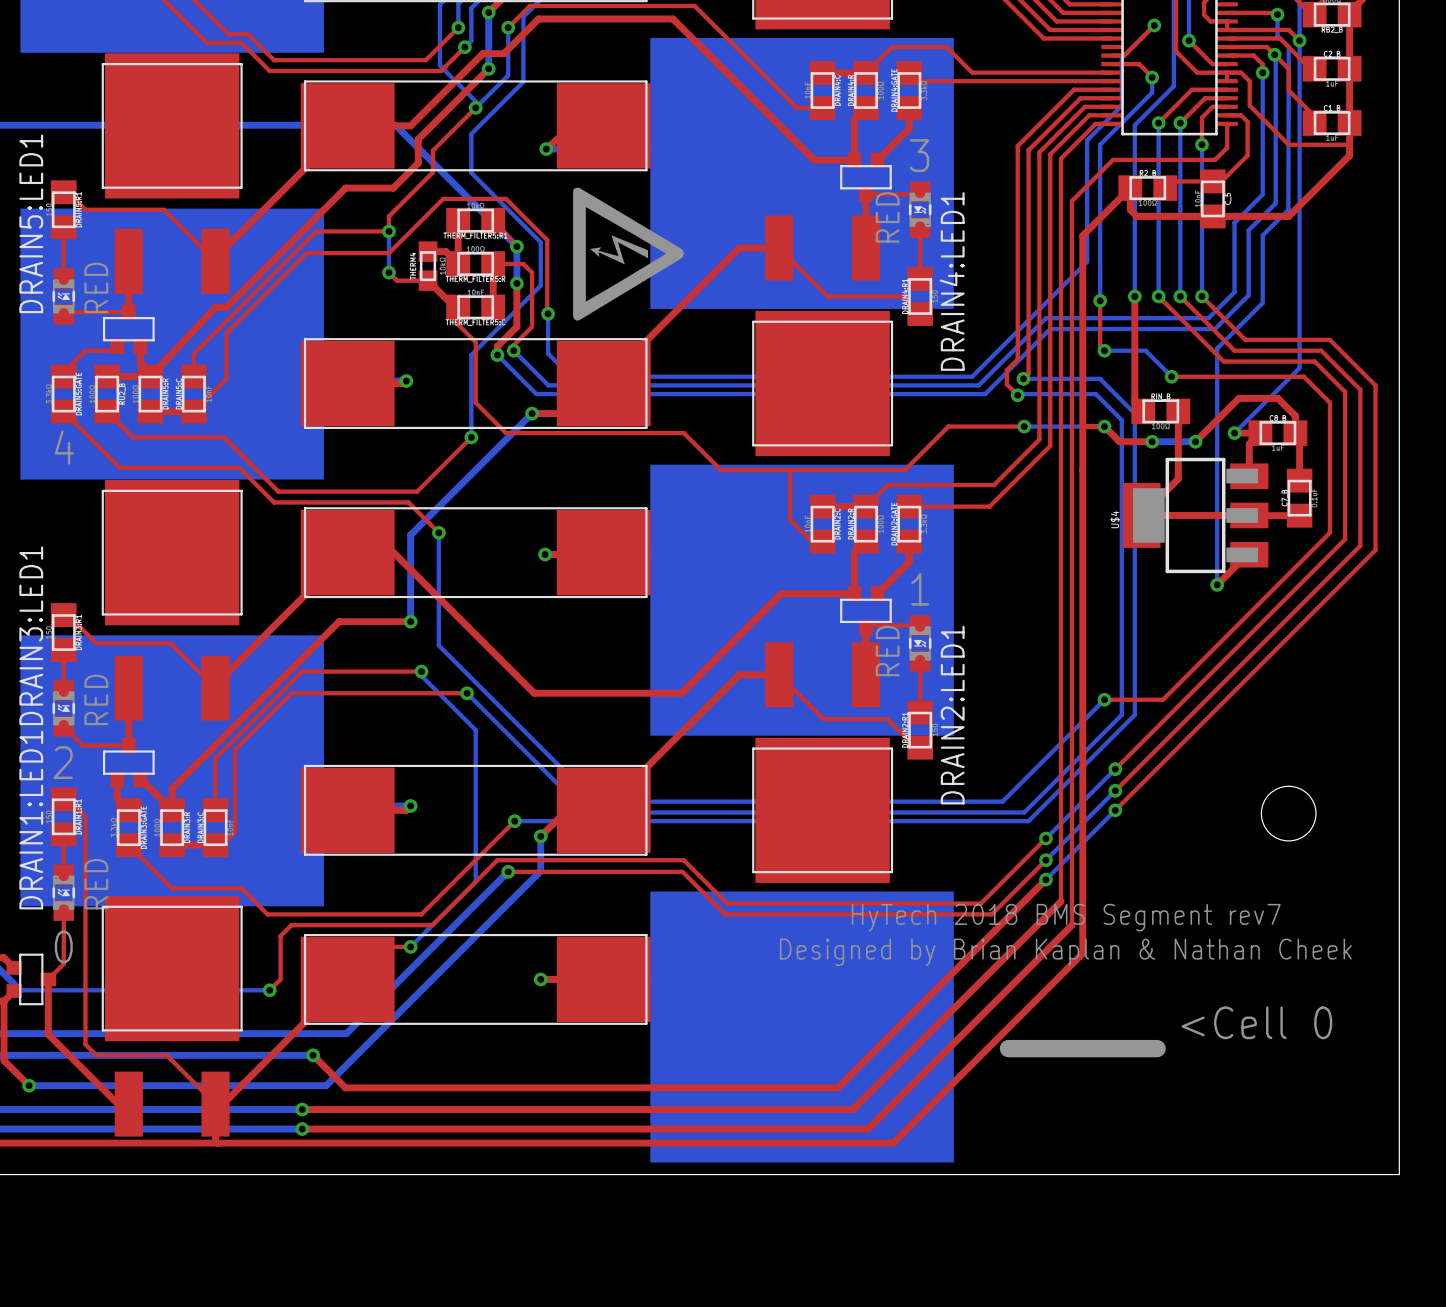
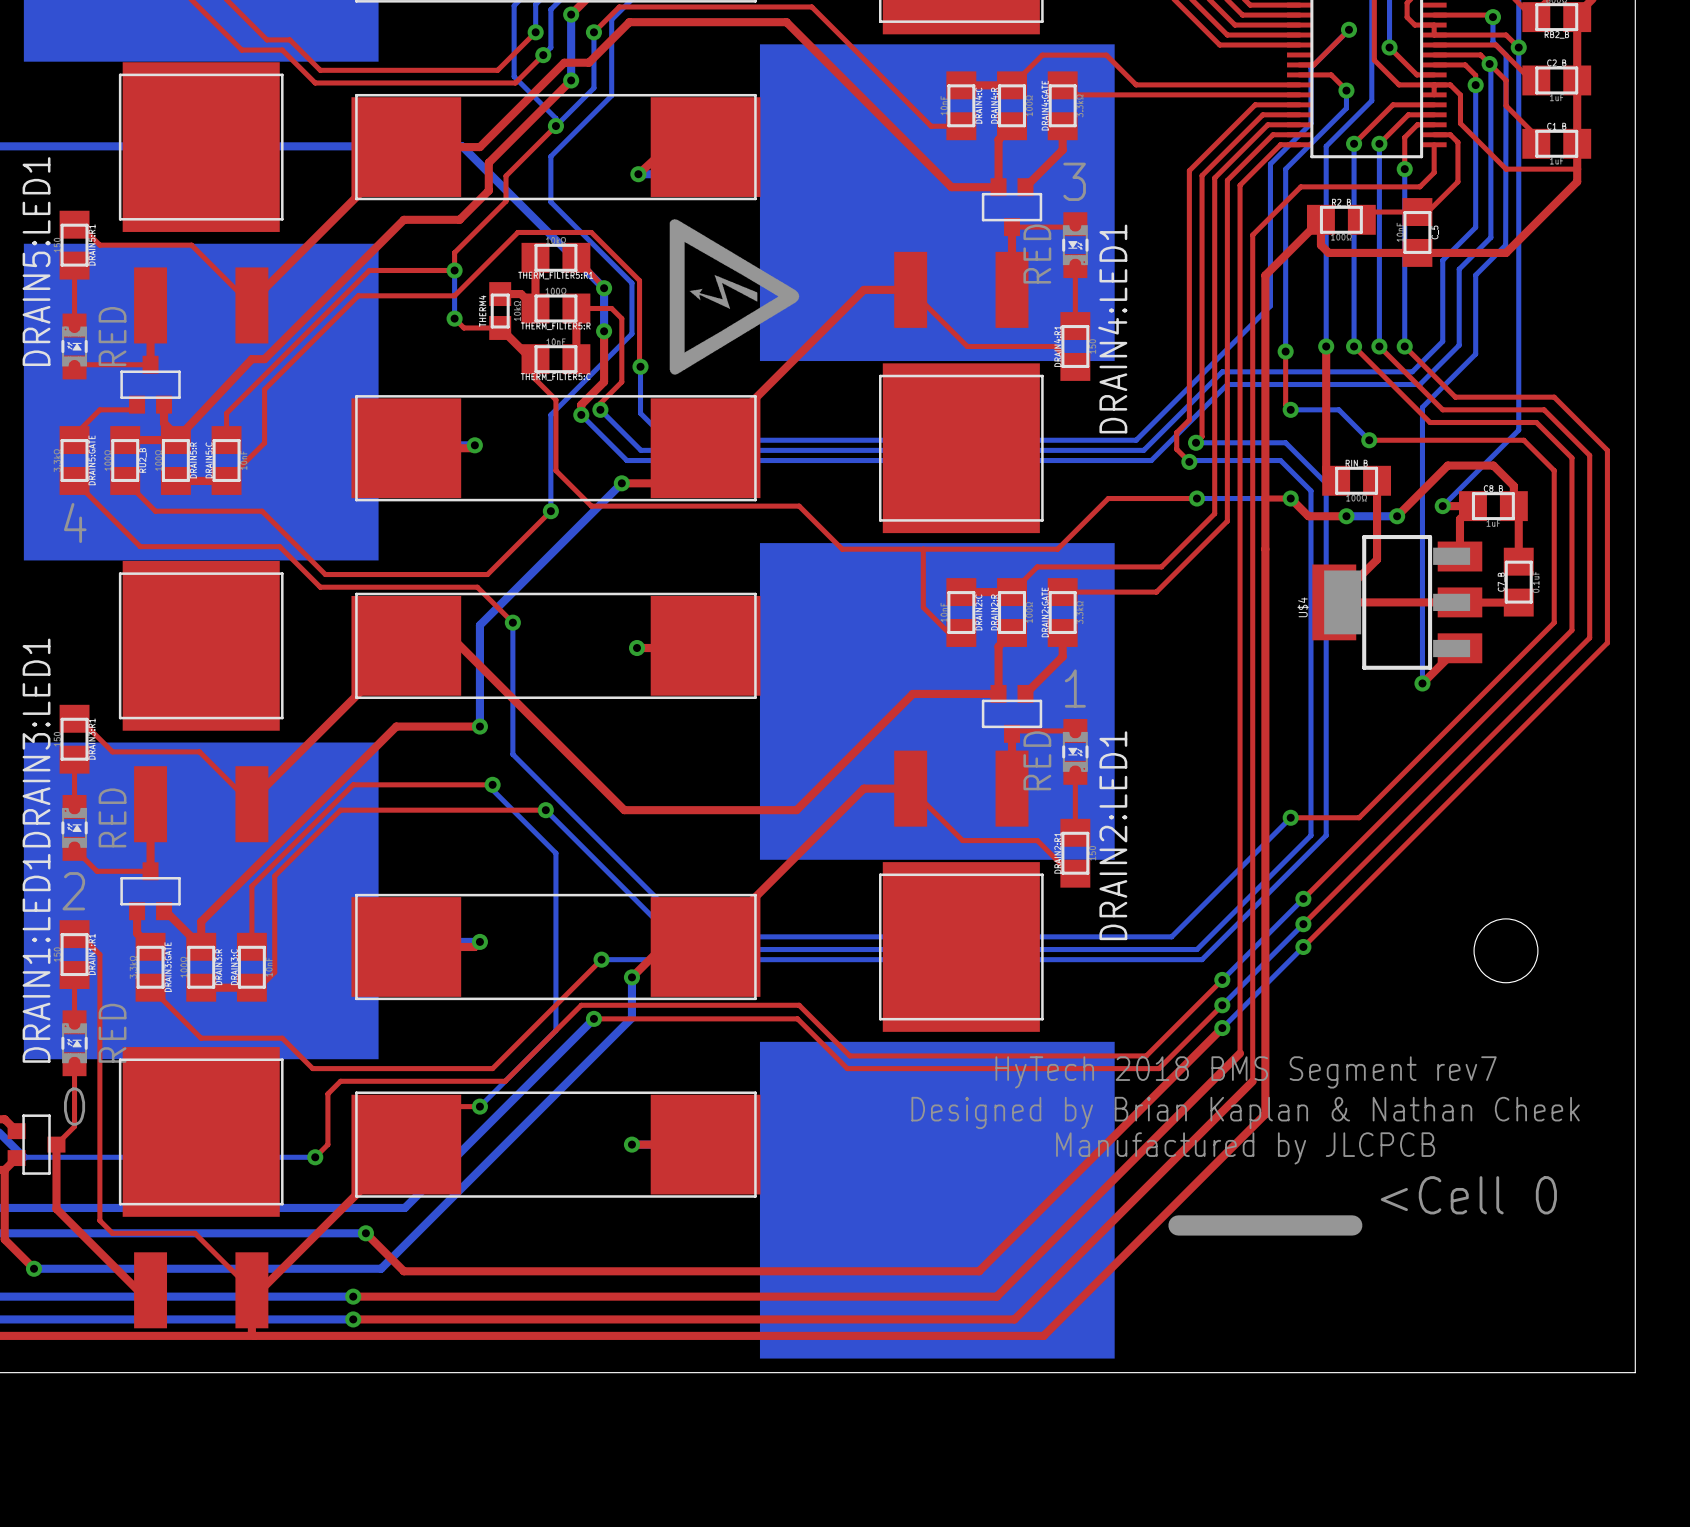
text: none -> Manufactured by JLCPCB (1245, 1148)

